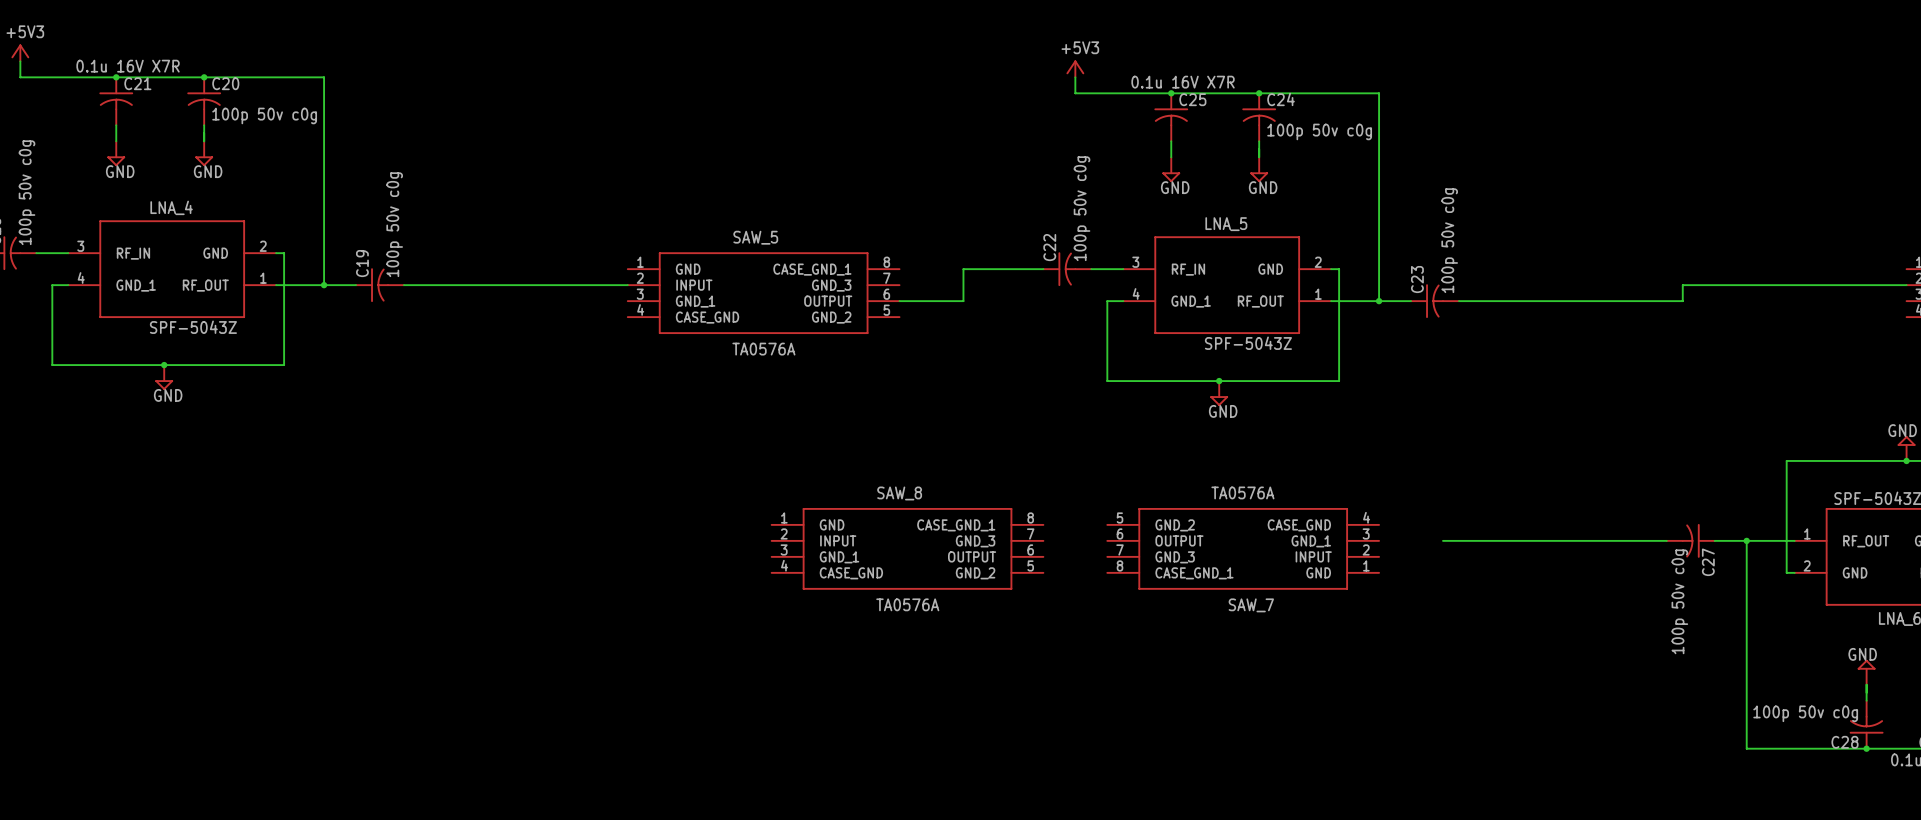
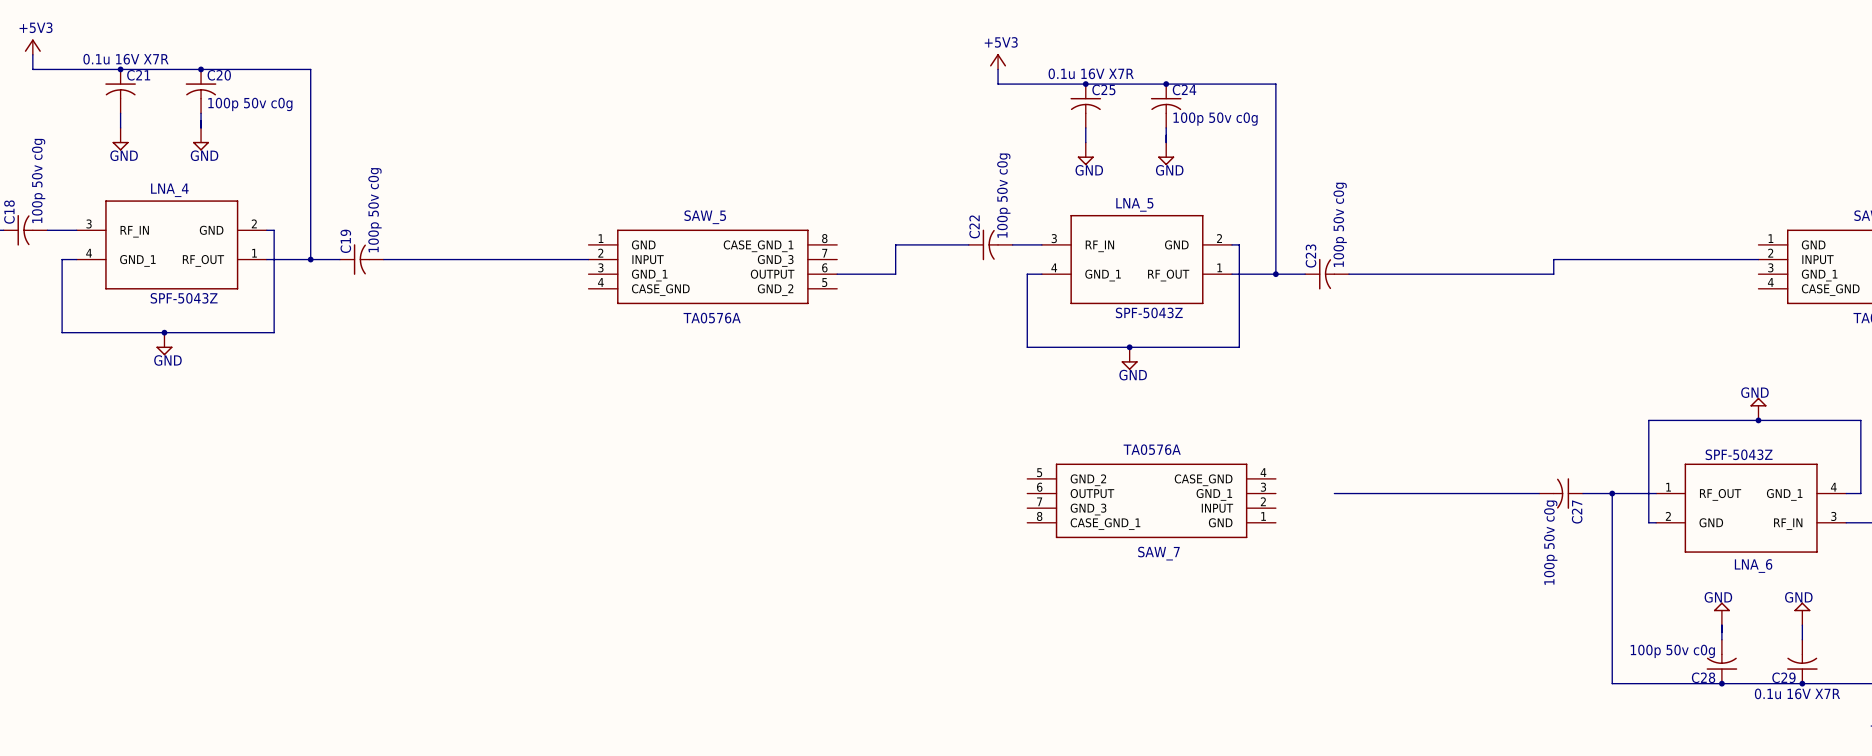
SAW_8: TA0576A (907, 548) -> none

